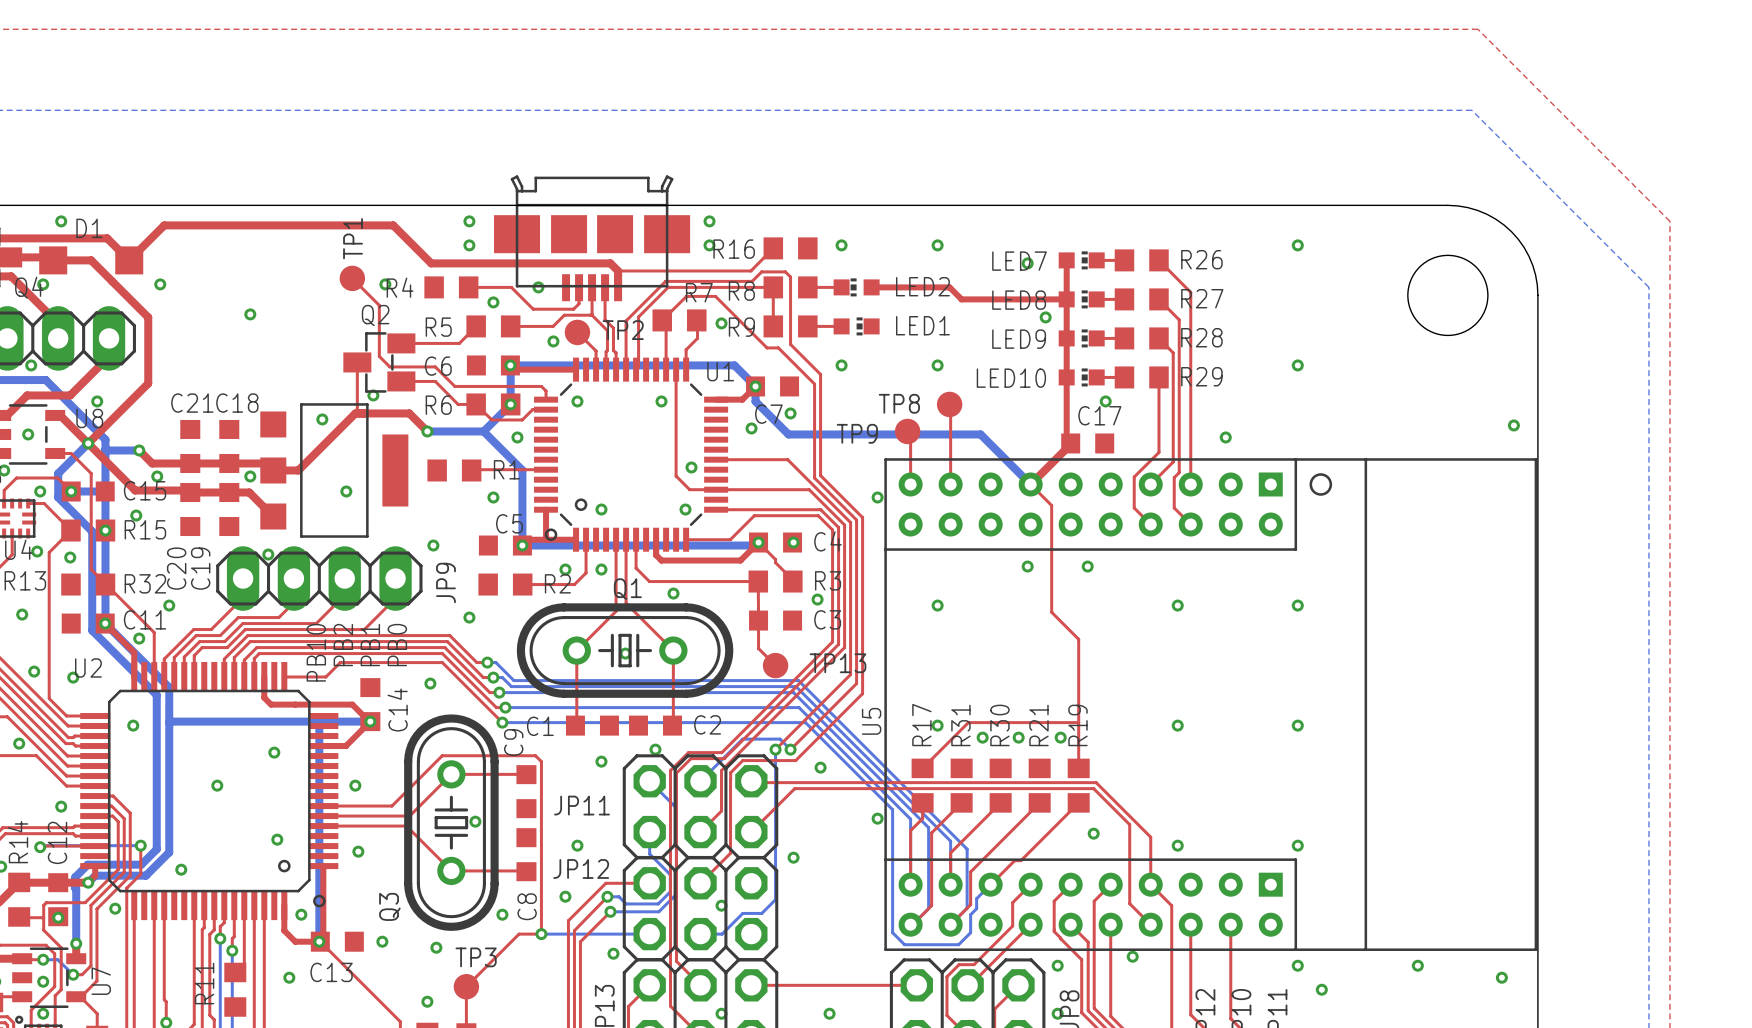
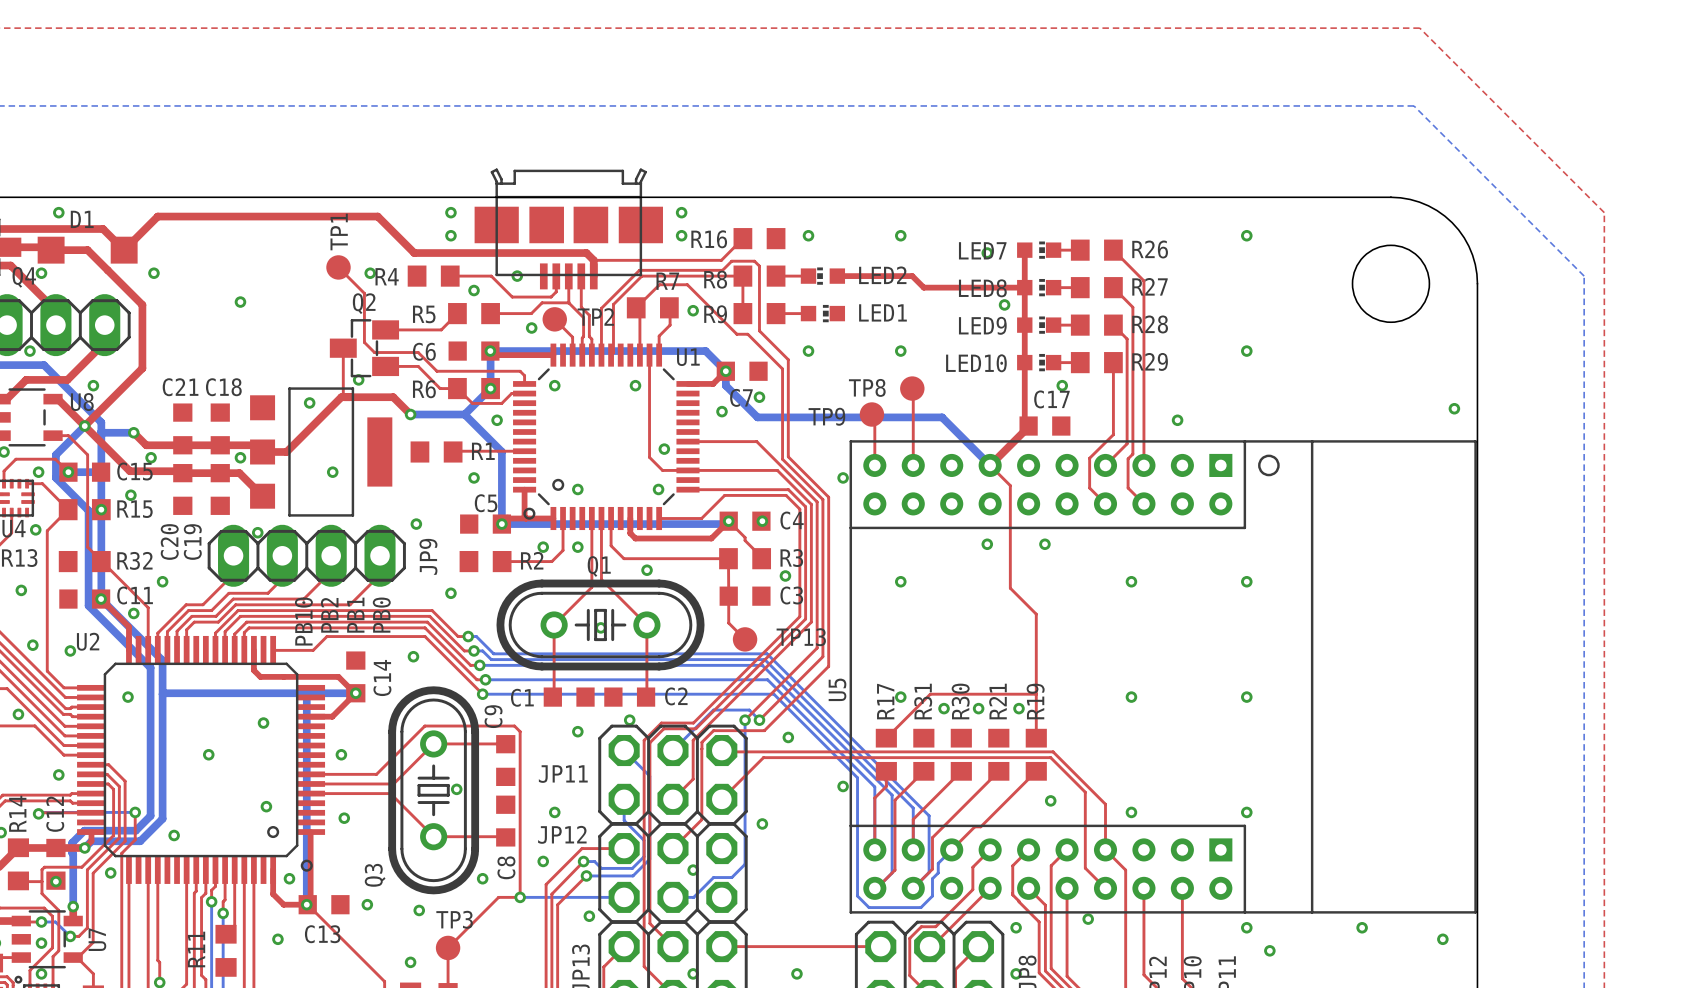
via: (28, 434) -> none
via: (70, 557) -> none

